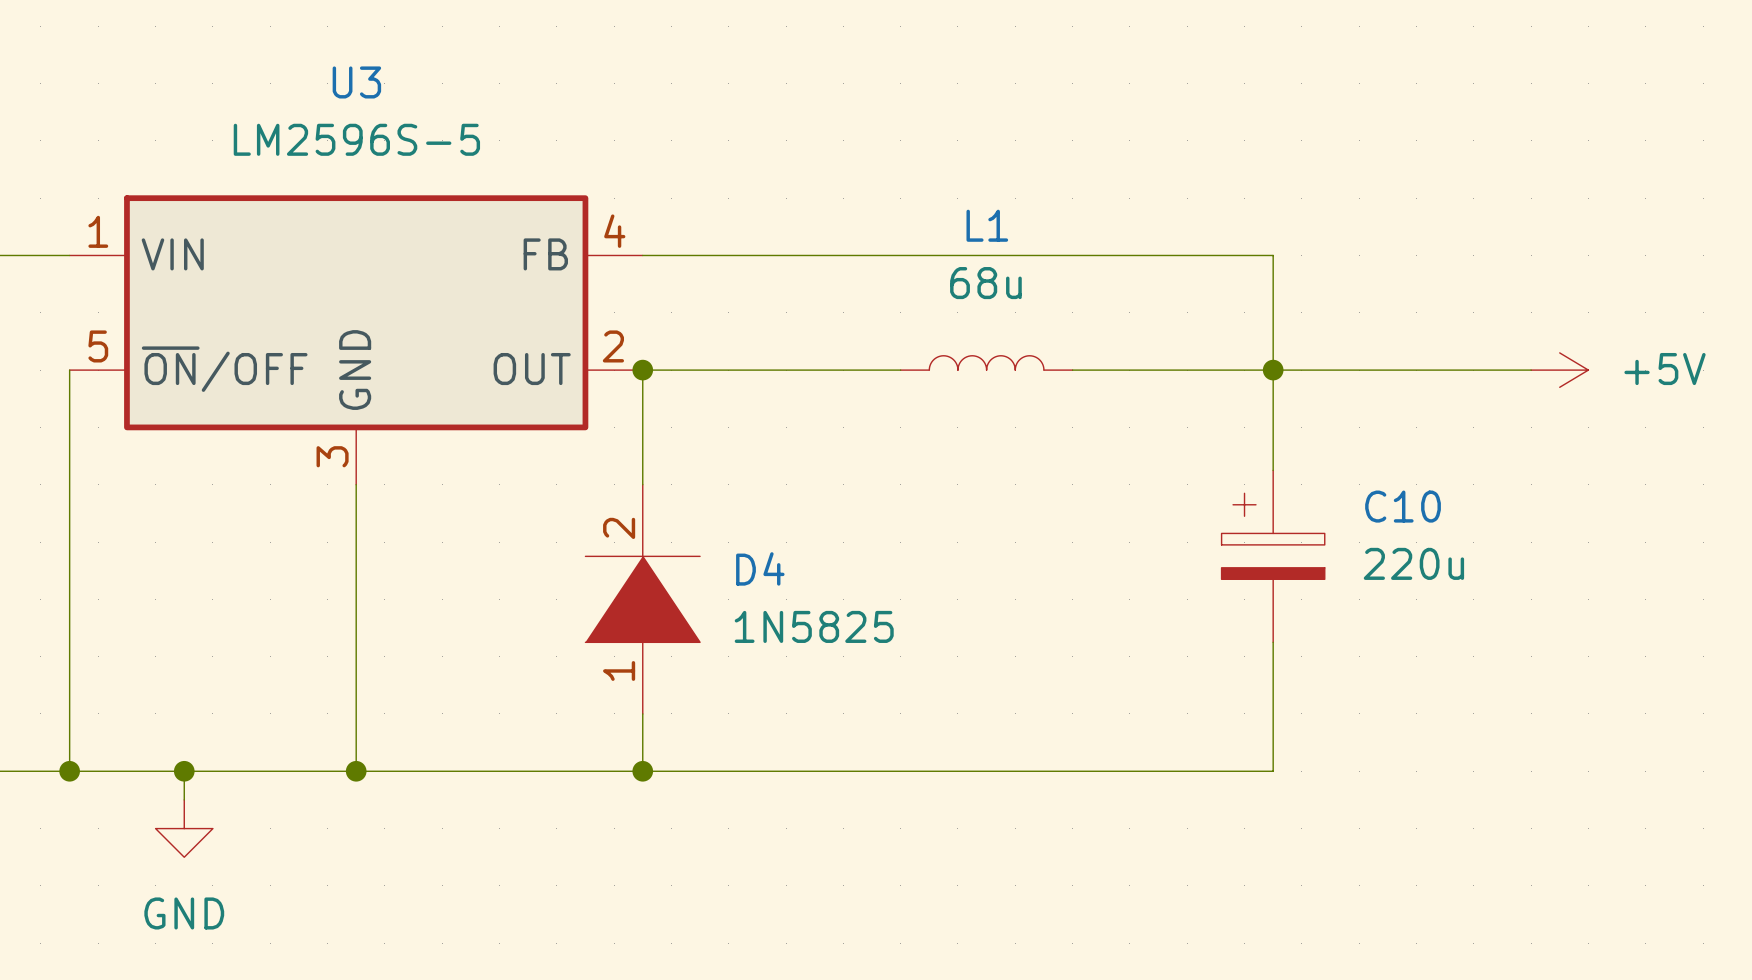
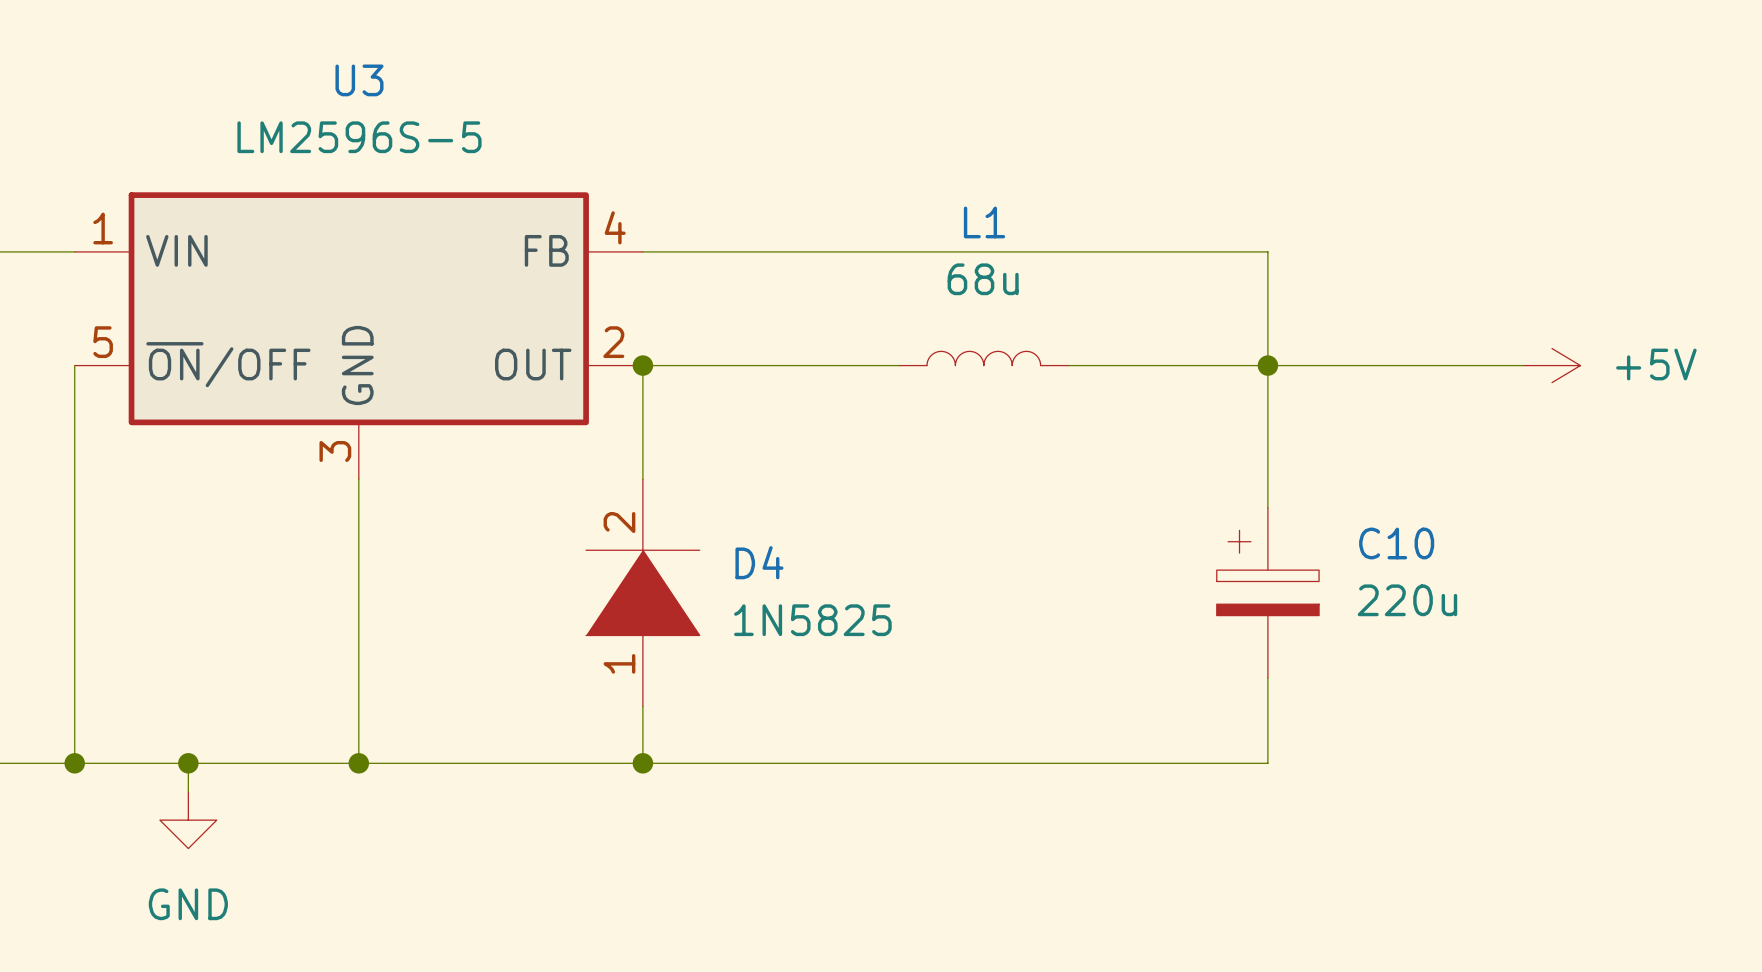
C10 position: (1273, 556) -> (1267, 592)

